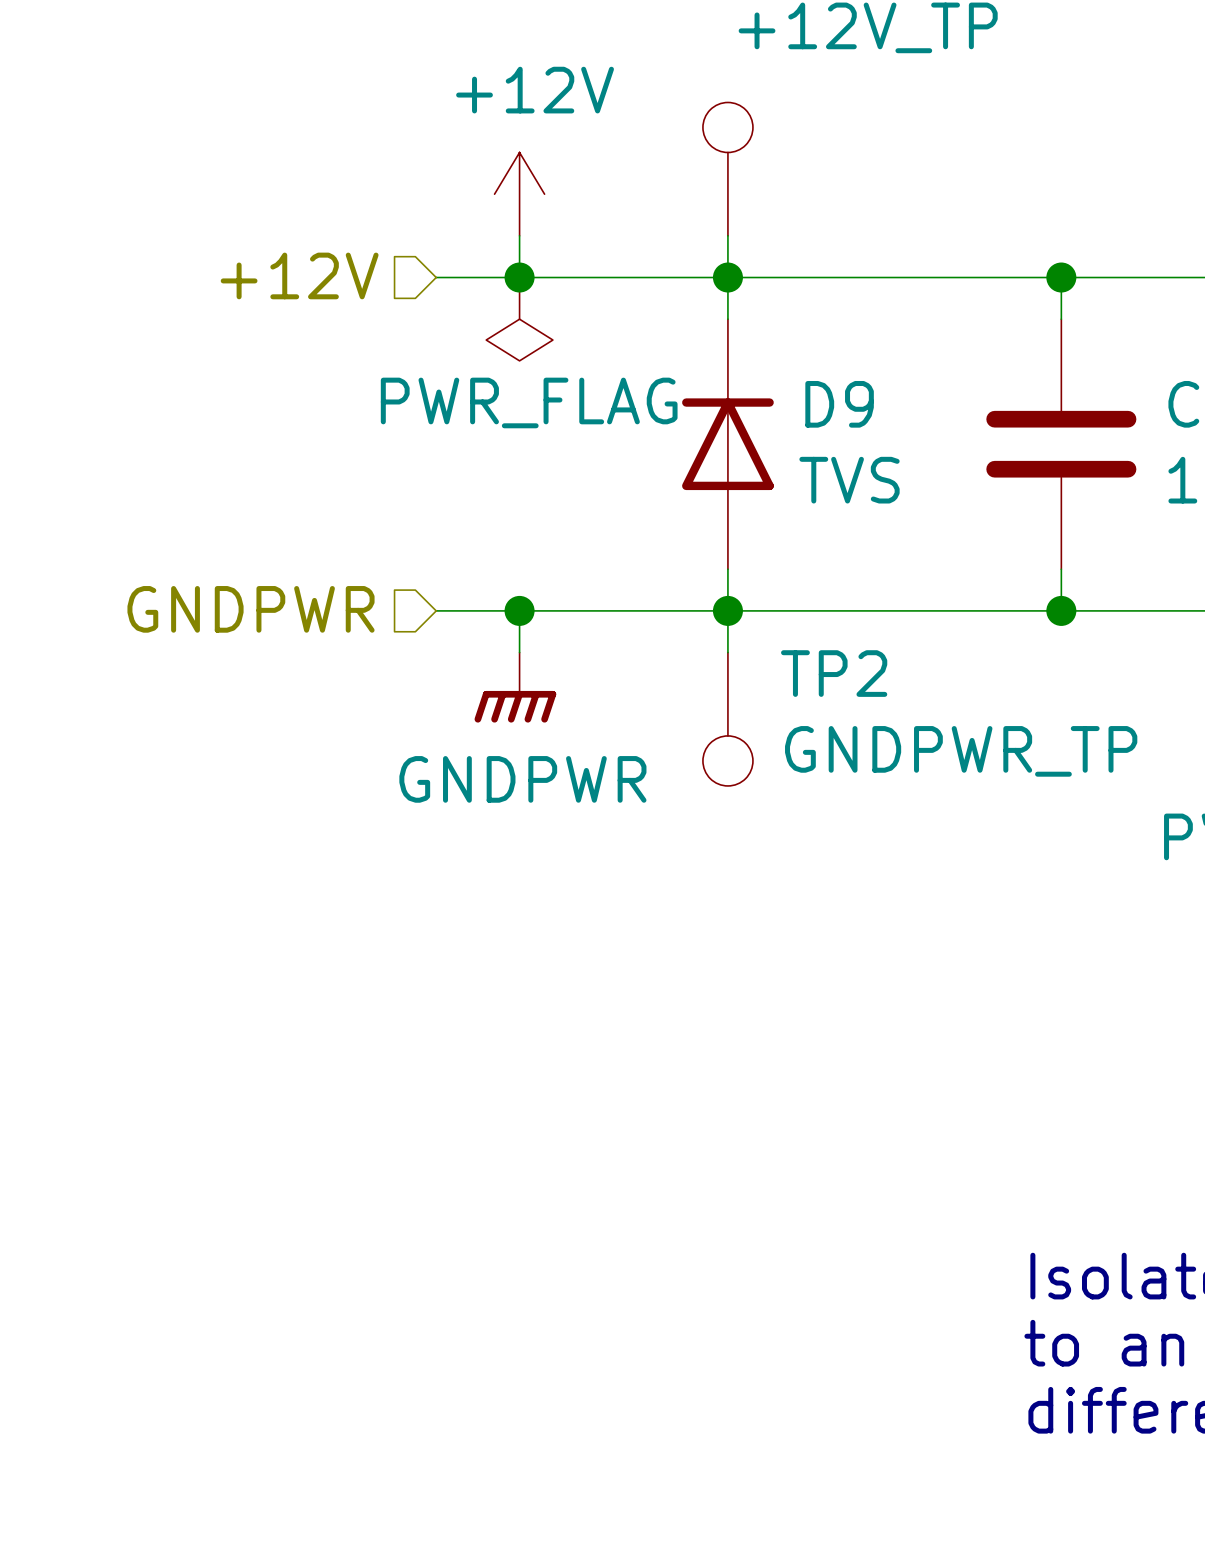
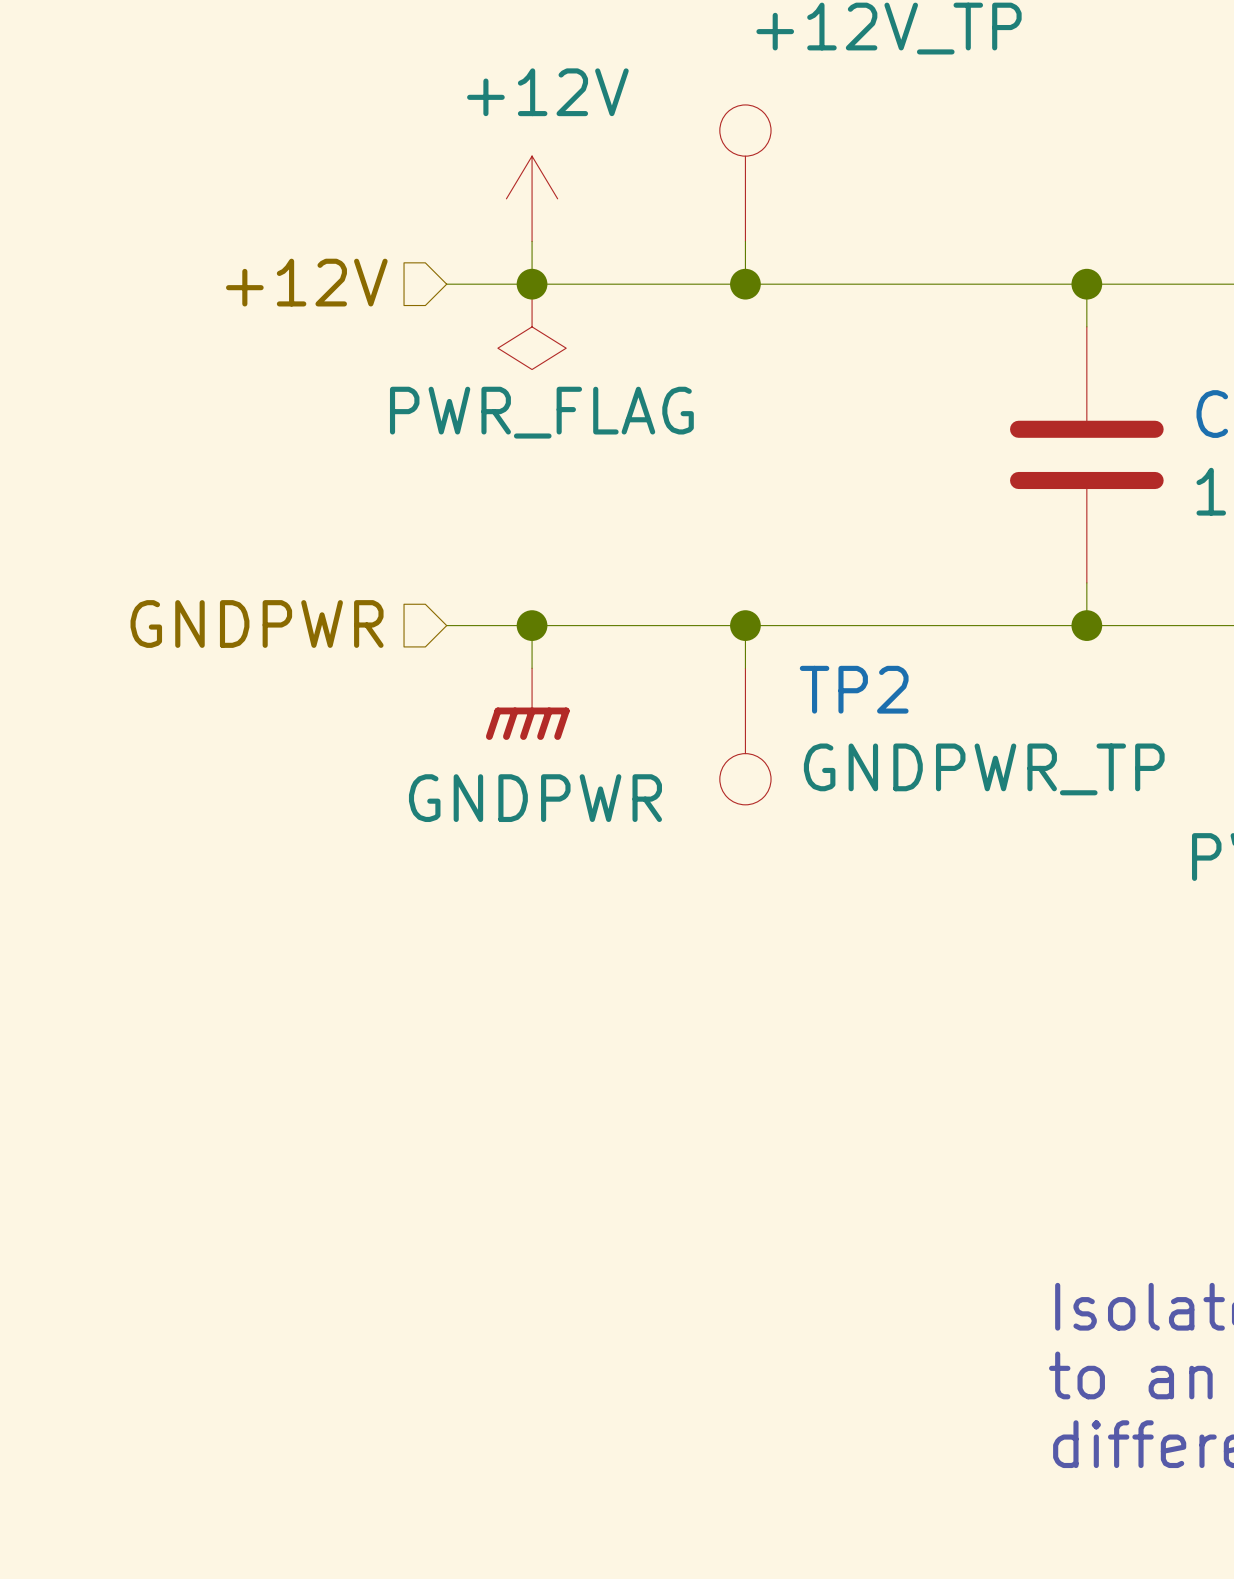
wire: (727, 277) (727, 319) -> none
D9: TVS (727, 444) -> none
wire: (727, 569) (727, 610) -> none

